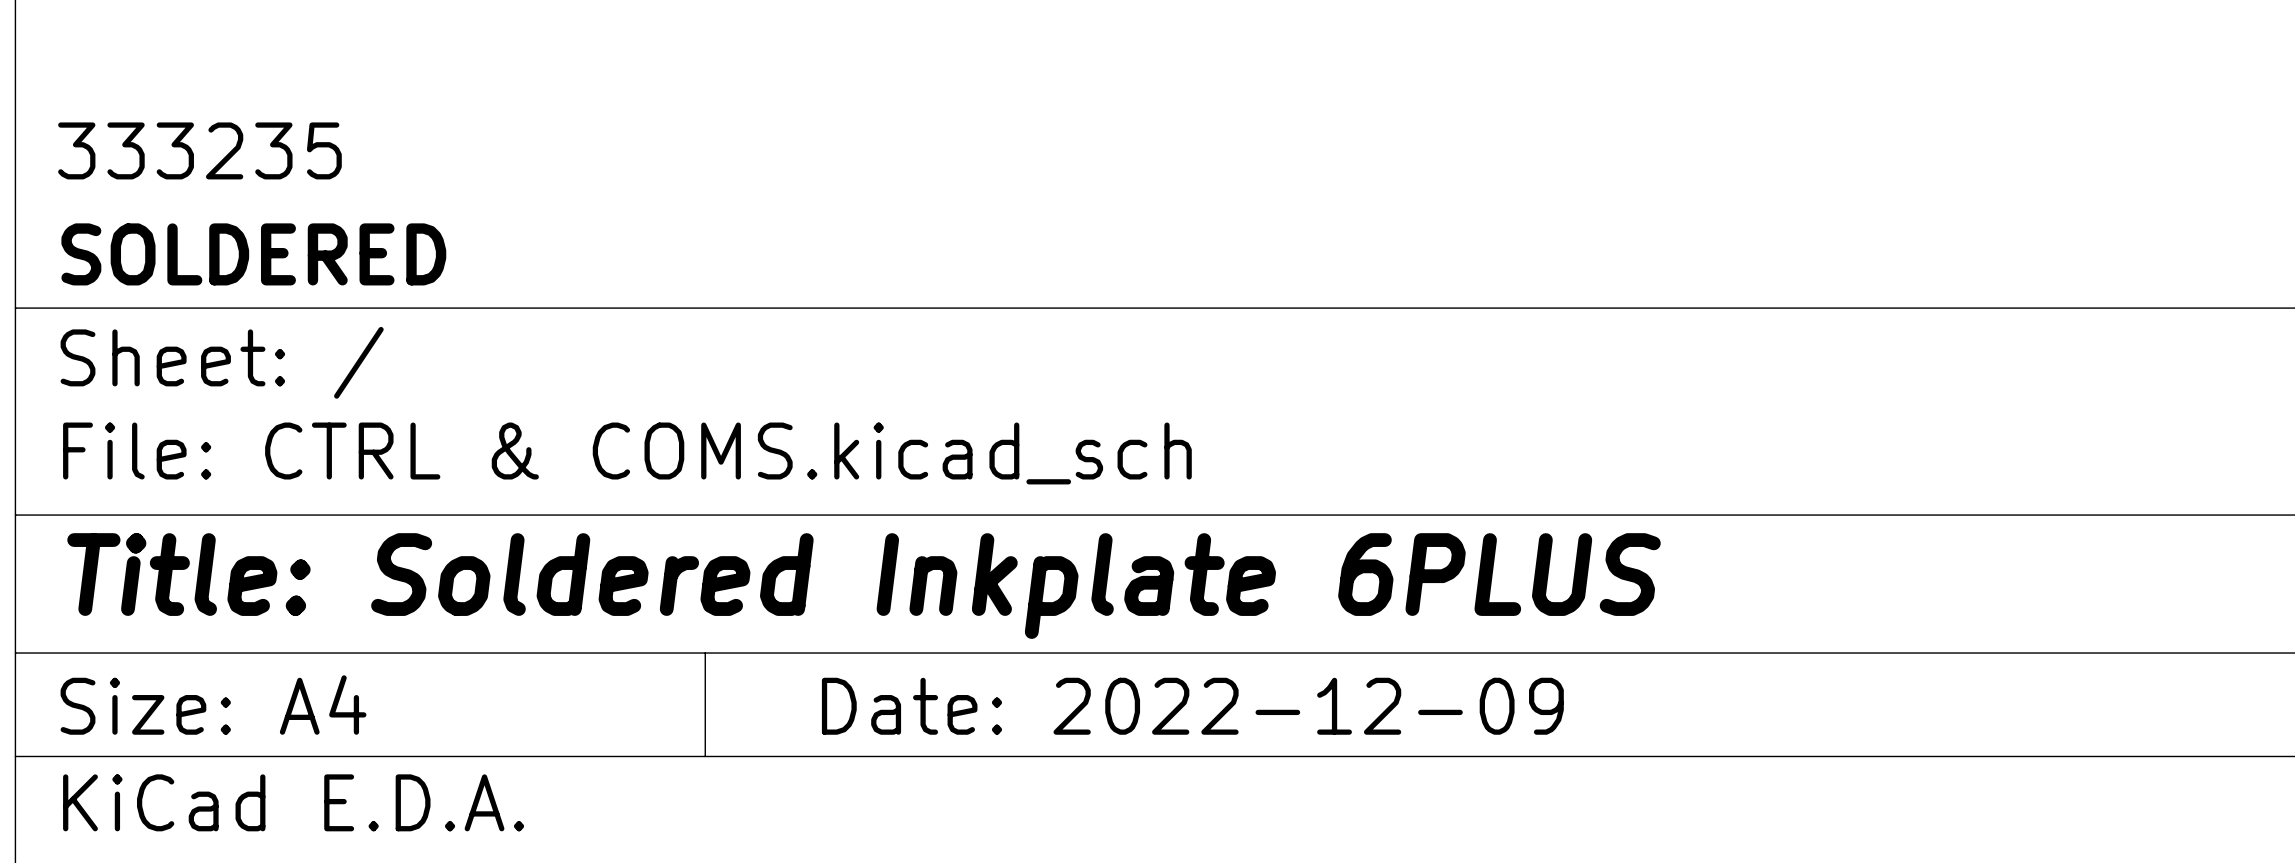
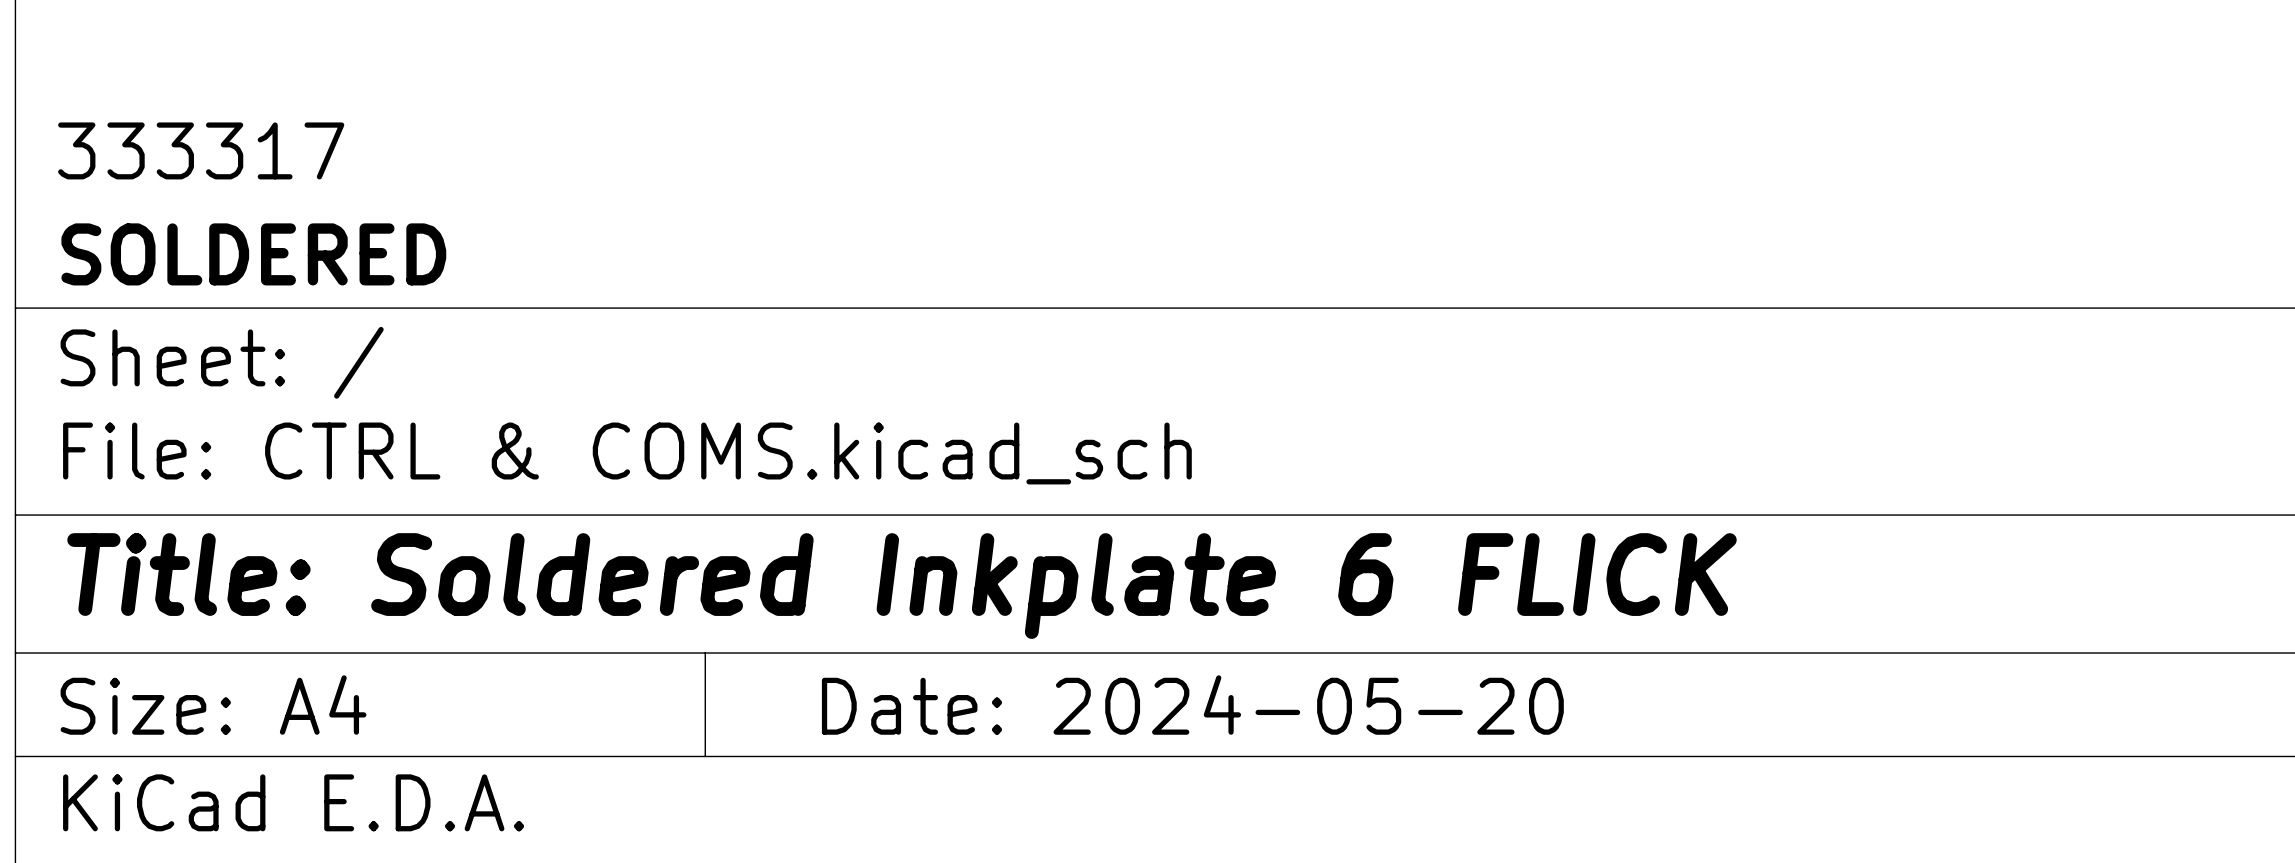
title block: 333235 (199, 150) -> 333317 (201, 150)
title block: Title: Soldered Inkplate 6PLUS (864, 586) -> Title: Soldered Inkplate 6 FLICK (902, 586)
title block: Date: 2022-12-09 (1192, 706) -> Date: 2024-05-20 (1192, 705)

